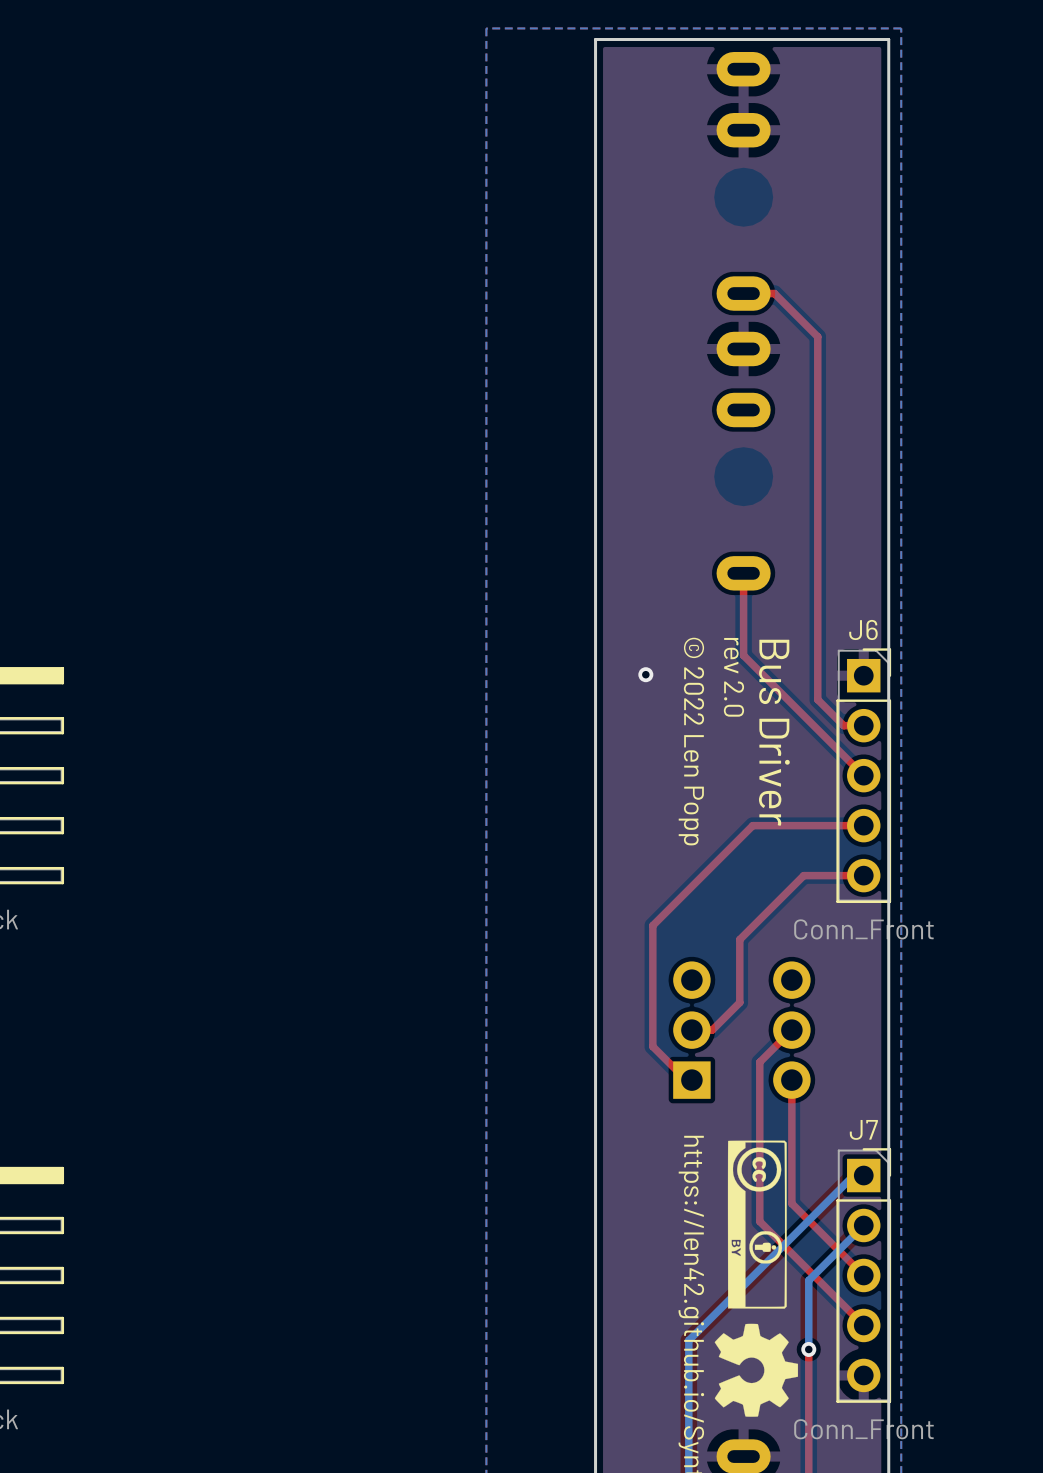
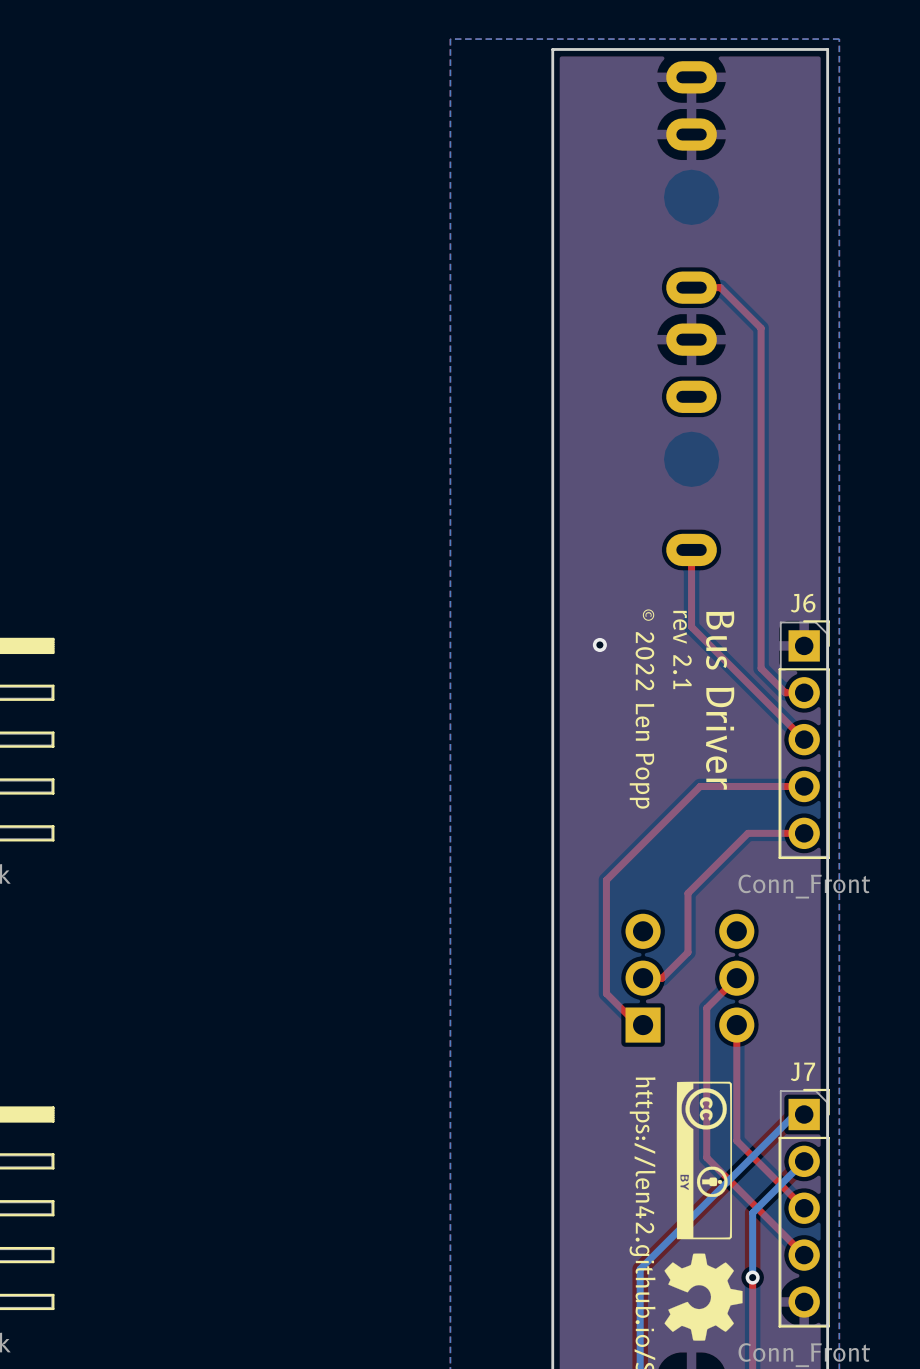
text: rev 2.0 (733, 677) -> rev 2.1 (682, 649)

